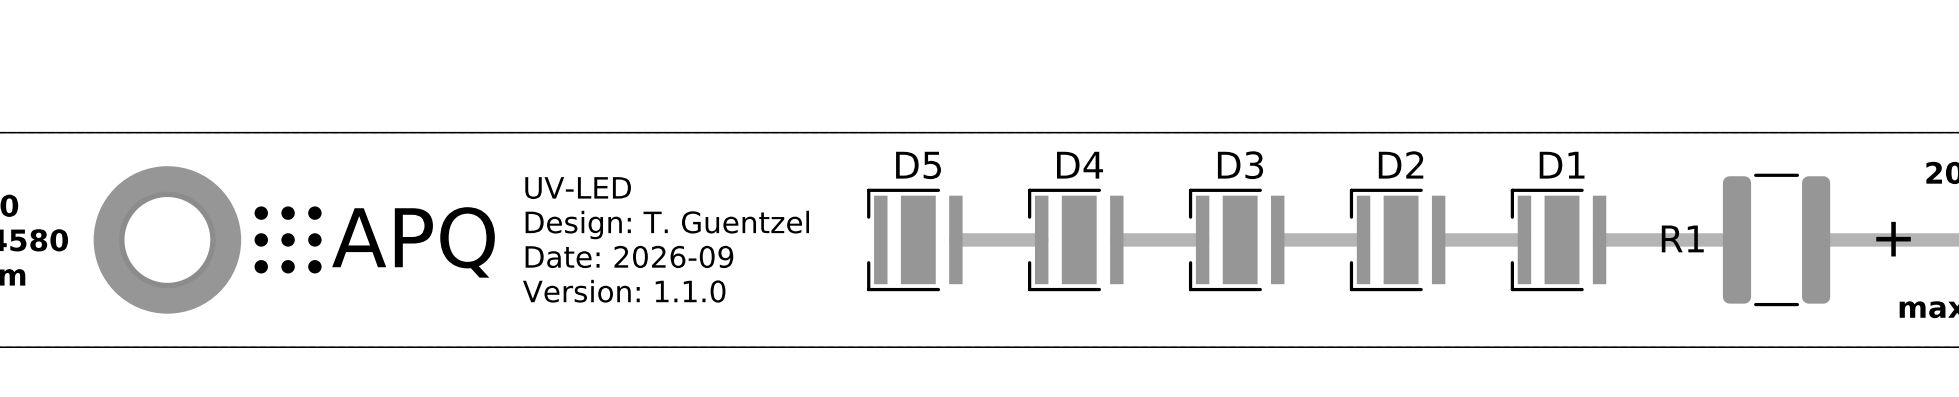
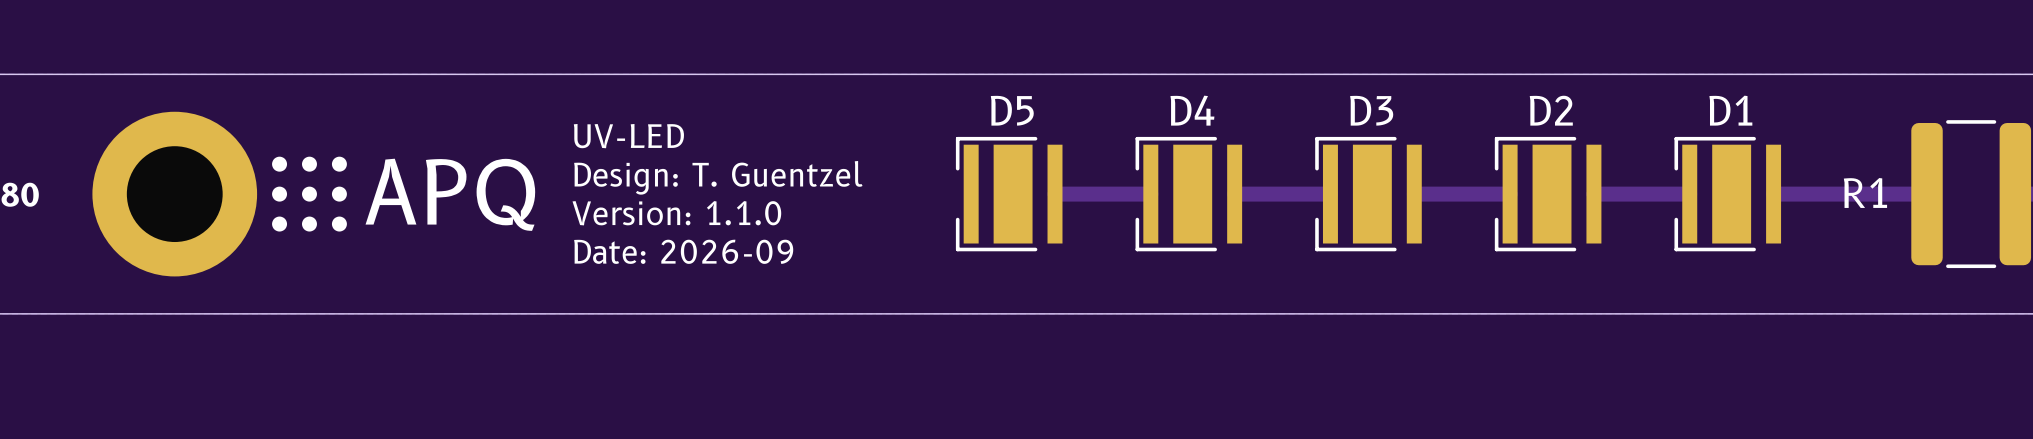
text: Date: 2026-09 (629, 256) -> Version: 1.1.0 (676, 213)
text: Version: 1.1.0 (624, 291) -> Date: 2026-09 (683, 251)

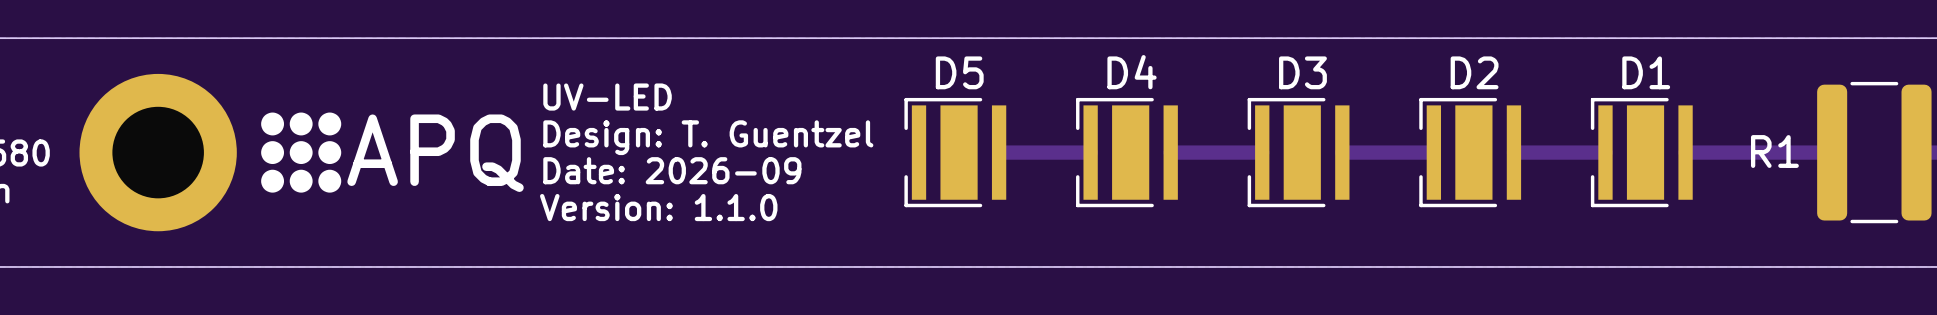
drawing shape: [272, 156, 536, 232] -> [261, 112, 524, 193]
text: Version: 1.1.0 (676, 213) -> Date: 2026-09 (672, 170)
text: Date: 2026-09 (683, 251) -> Version: 1.1.0 (658, 207)

